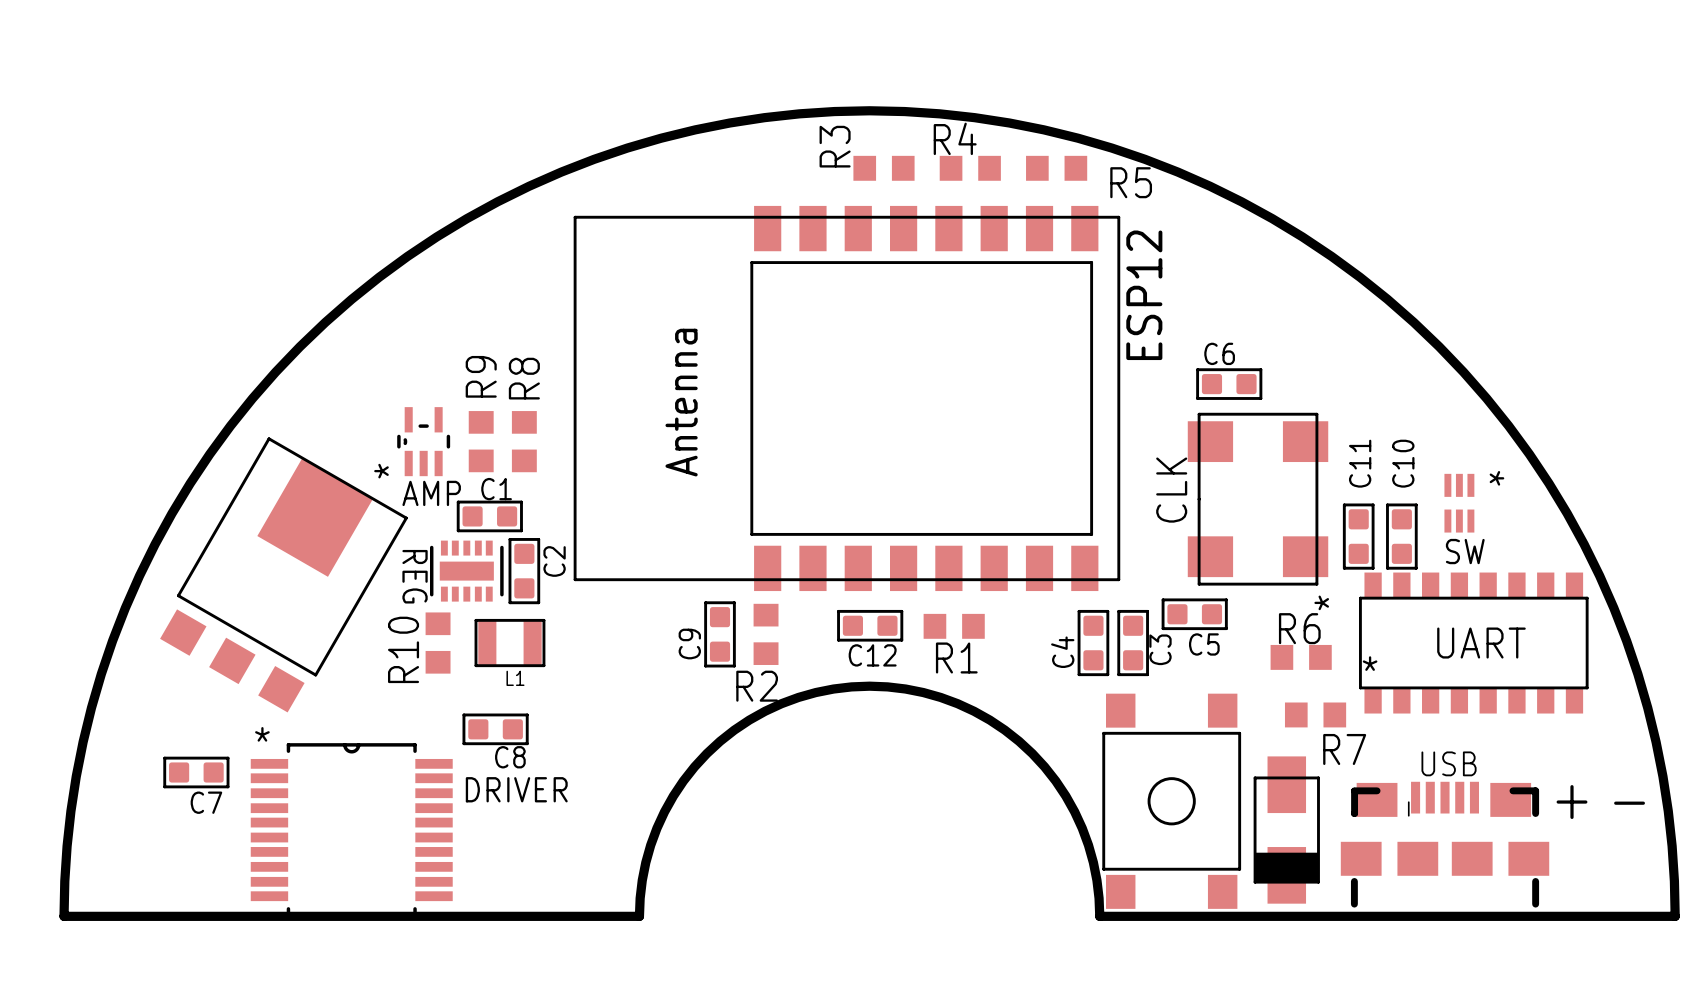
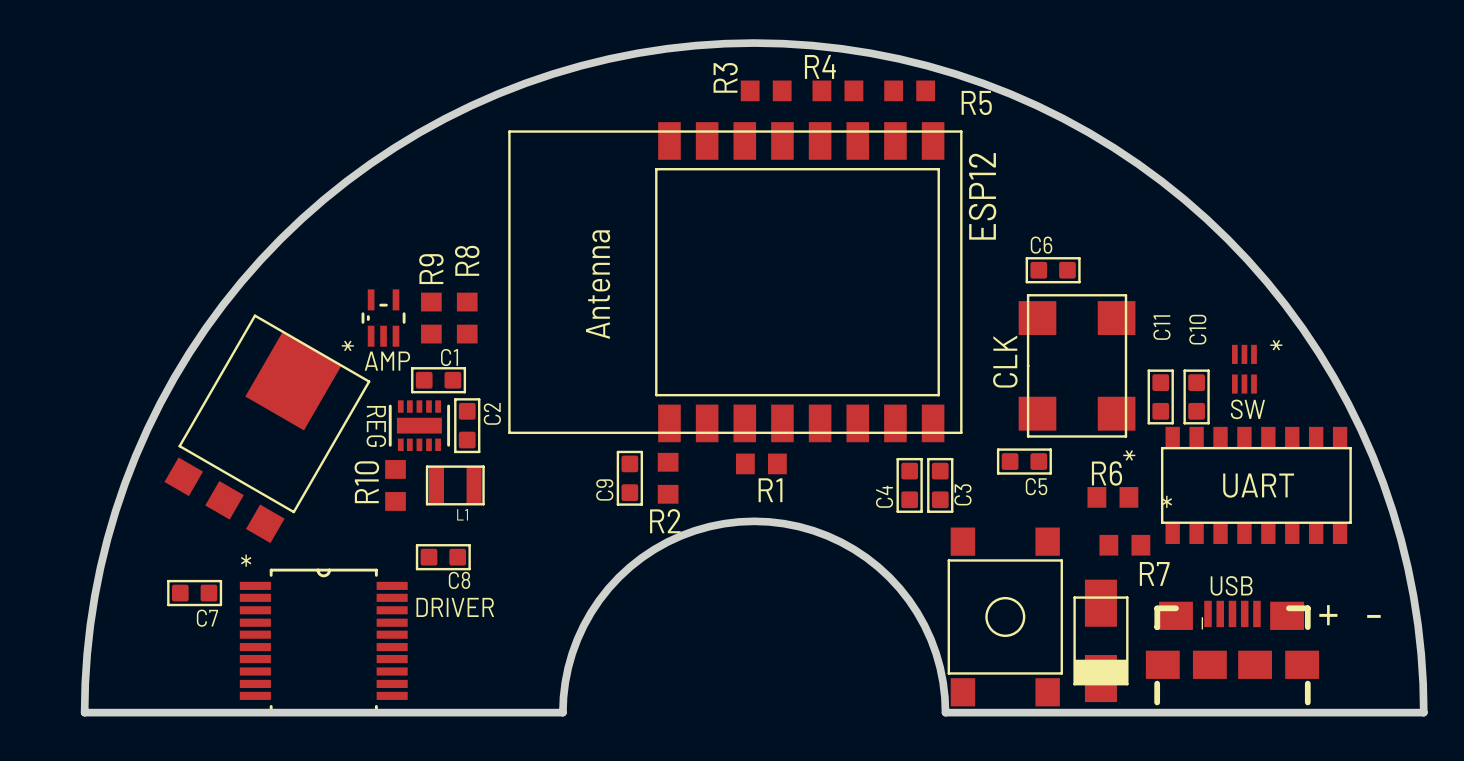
C12: (870, 625) -> none
R1 position: (954, 626) -> (761, 463)
C4: none -> (909, 485)
C3: (1133, 643) -> none
C4 name: C4 (1062, 652) -> C3 (962, 494)

